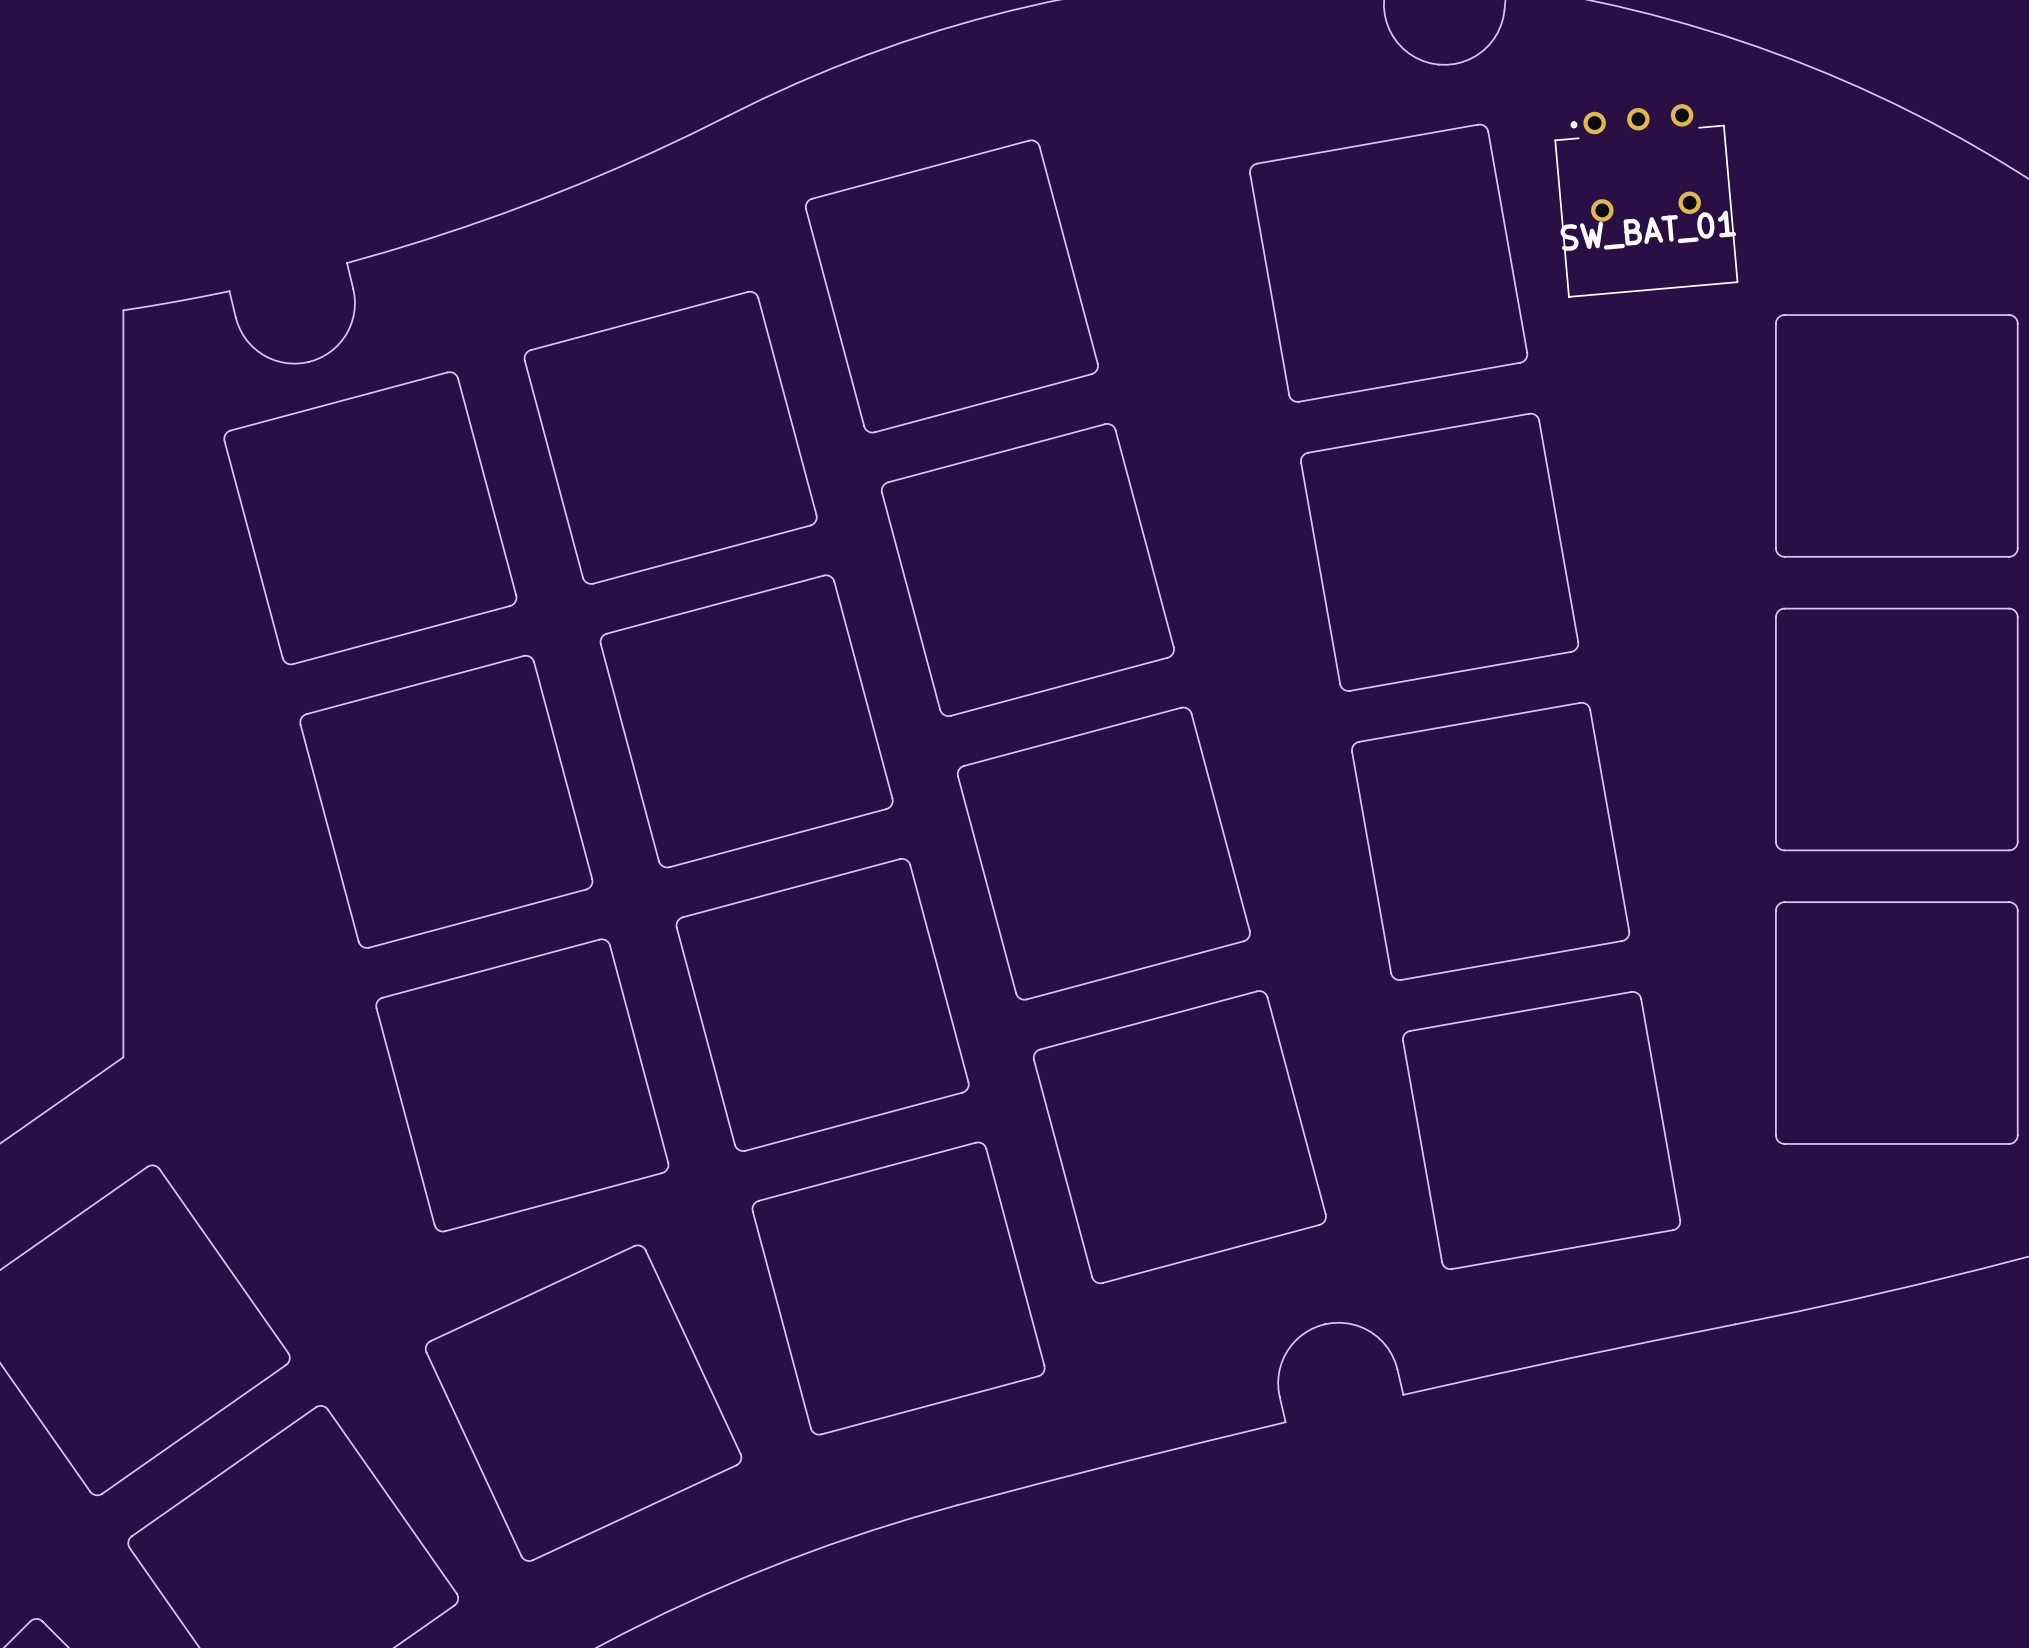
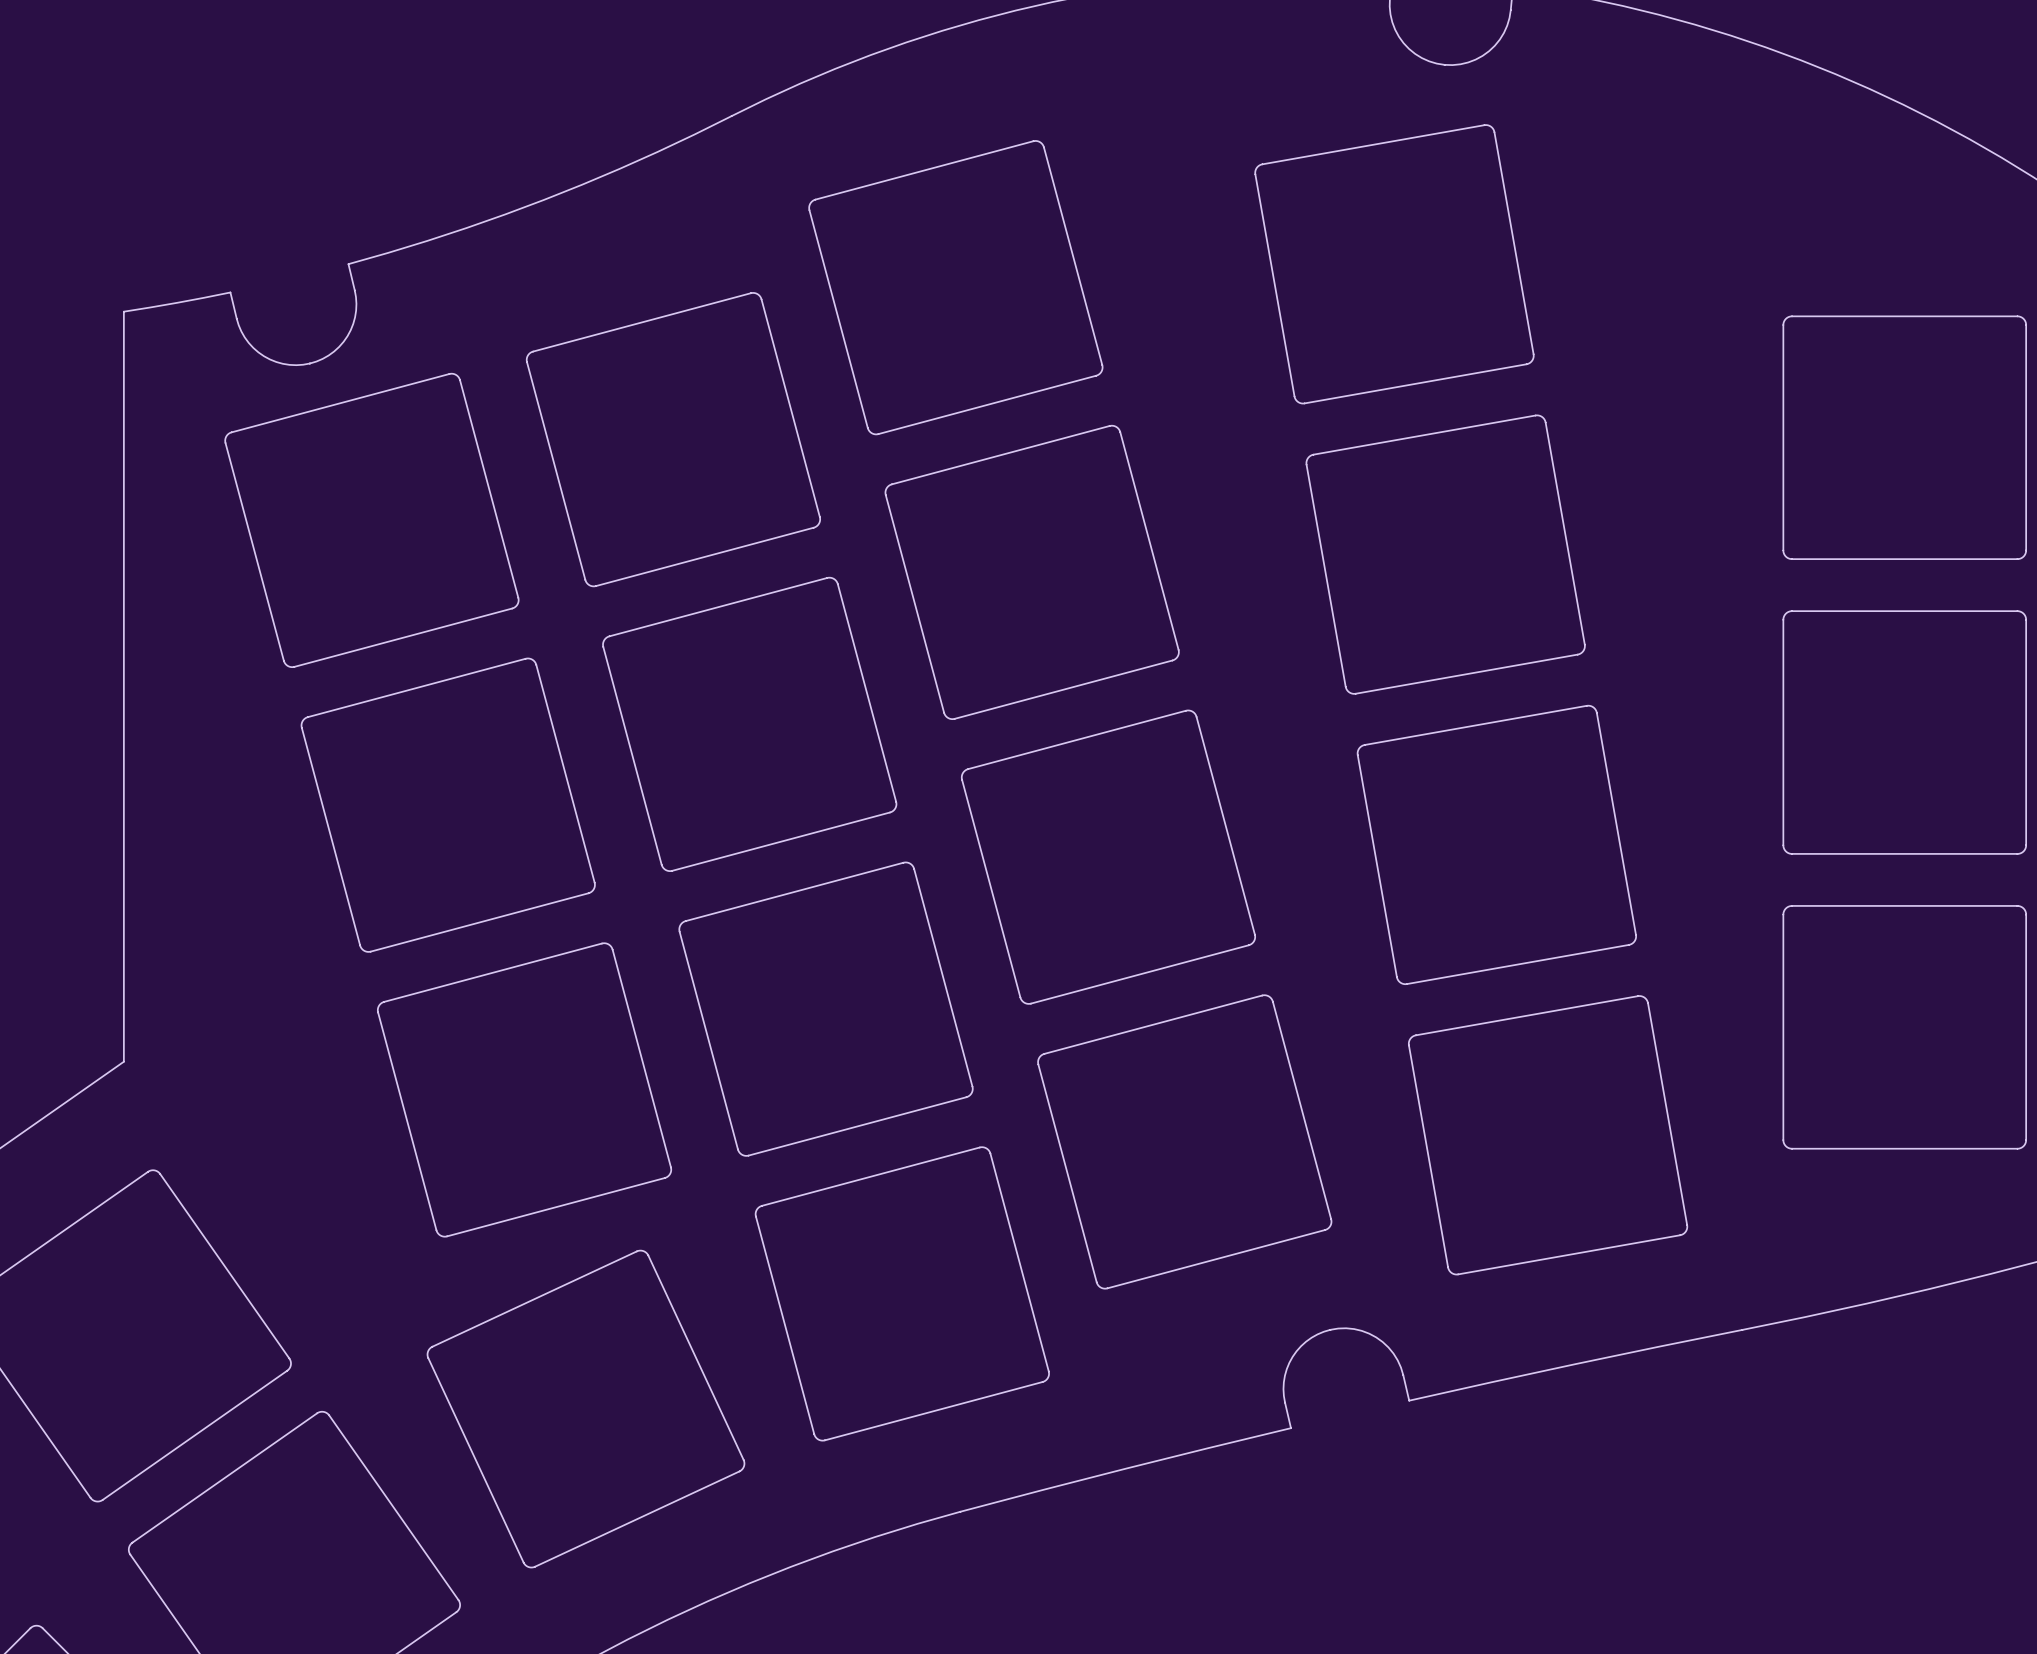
SW_BAT_01: (1646, 200) -> none

